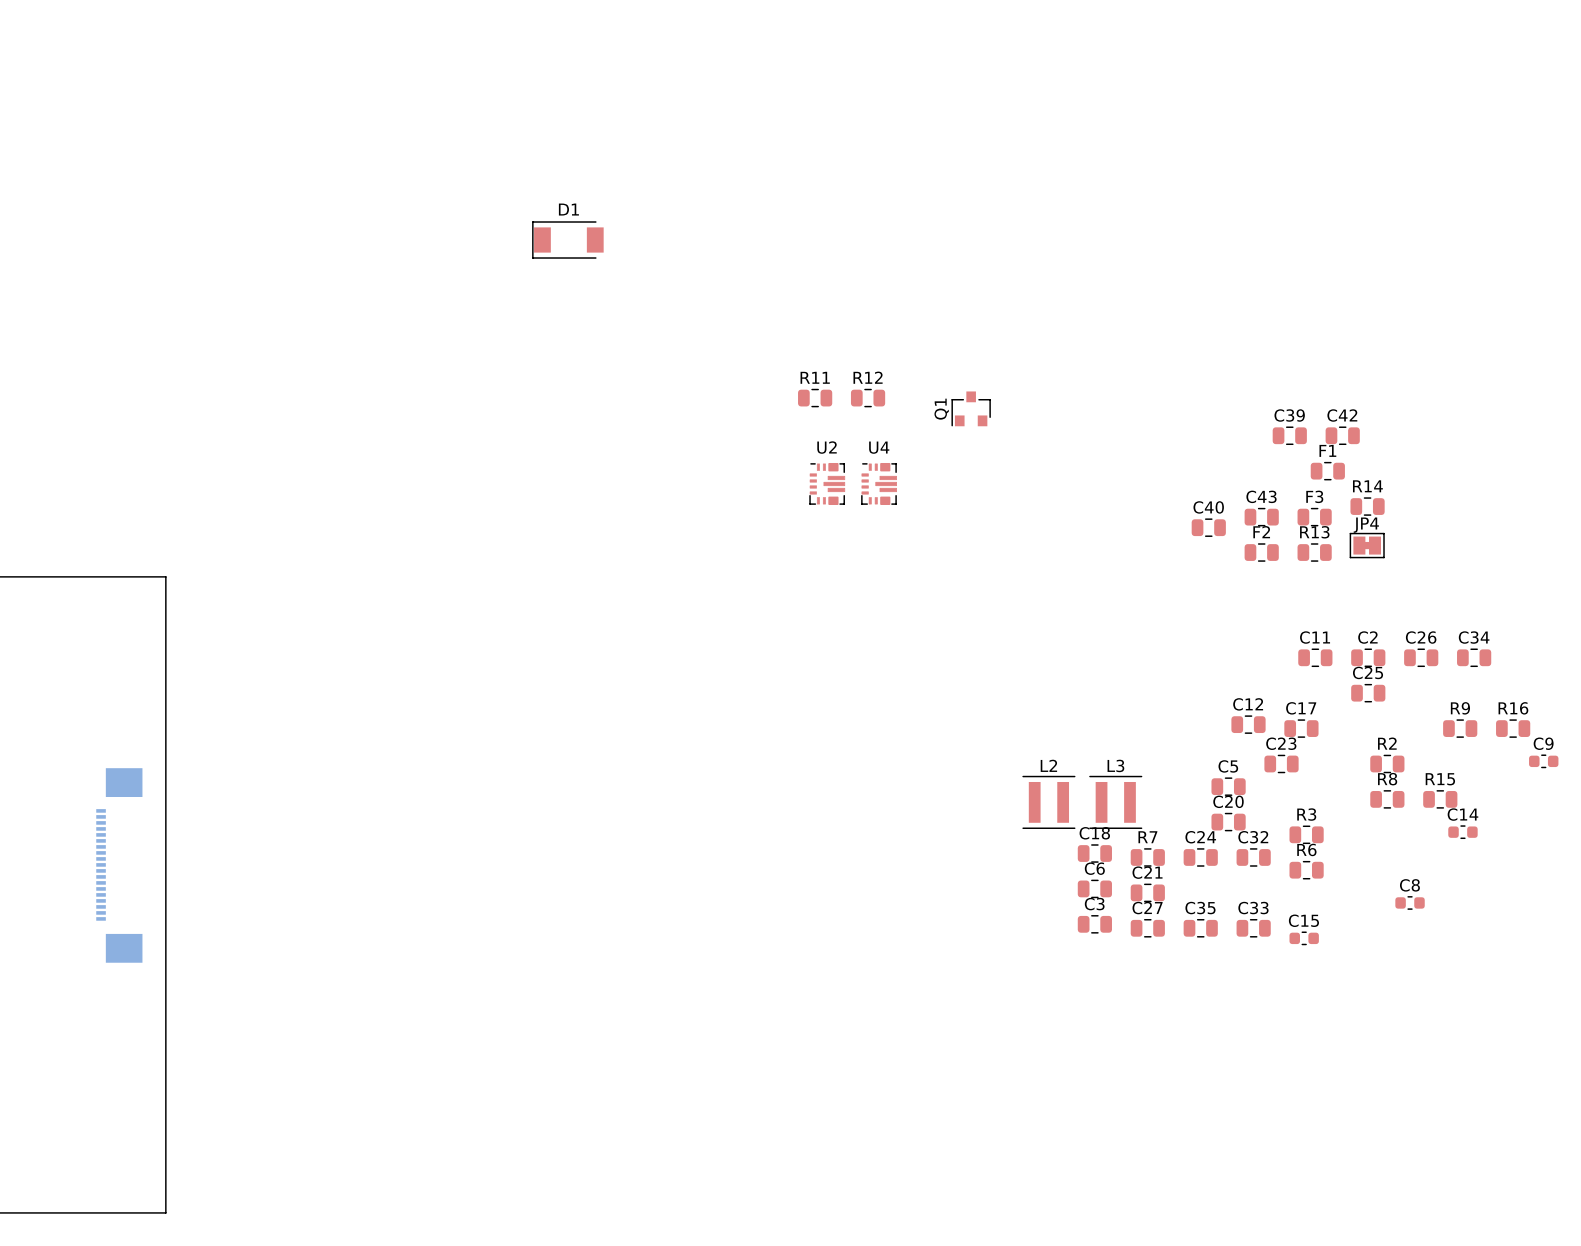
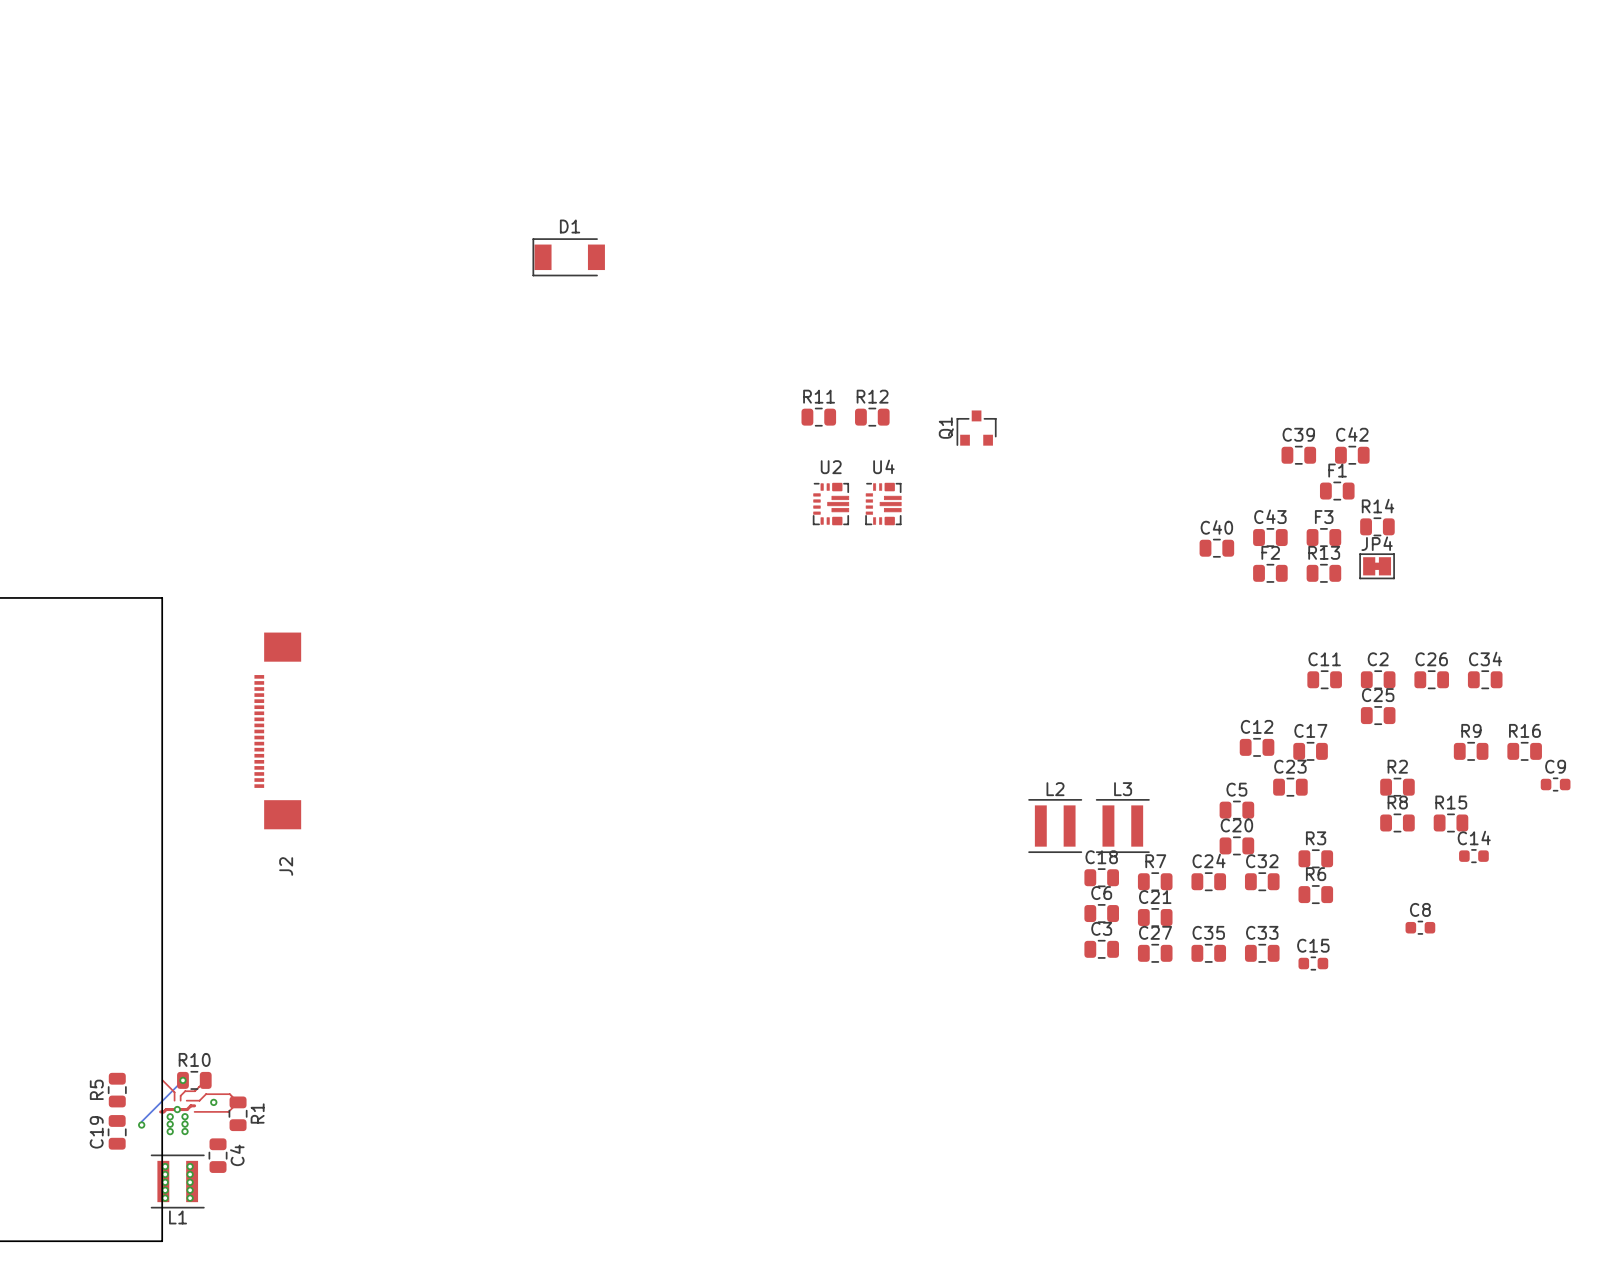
J2 side: bottom (119, 865) -> top (277, 730)
top track: none -> (162, 1080) (174, 1092) (174, 1100)
bottom track: none -> (182, 1080) (141, 1121) (141, 1125)
via: none -> (182, 1080)
R10: none -> (194, 1080)
top track: none -> (205, 1080) (194, 1091) (185, 1091) (180, 1095) (180, 1100)
R5: none -> (117, 1090)
top track: none -> (186, 1100) (199, 1100) (206, 1094) (229, 1094) (238, 1102) (228, 1111) (194, 1111)
via: none -> (213, 1102)
top track: none -> (194, 1105) (190, 1105) (187, 1109) (166, 1109) (160, 1111)
via: none -> (177, 1109)
R1: none -> (238, 1113)
via: none -> (170, 1116)
via: none -> (185, 1116)
via: none -> (170, 1124)
via: none -> (185, 1124)
via: none -> (141, 1125)
via: none -> (170, 1131)
via: none -> (185, 1131)
C19: none -> (117, 1132)
C4: none -> (218, 1155)
via: none -> (165, 1166)
via: none -> (190, 1166)
via: none -> (165, 1174)
via: none -> (190, 1174)
L1: none -> (177, 1181)
via: none -> (165, 1182)
via: none -> (190, 1182)
via: none -> (165, 1190)
via: none -> (190, 1190)
via: none -> (165, 1198)
via: none -> (190, 1198)

